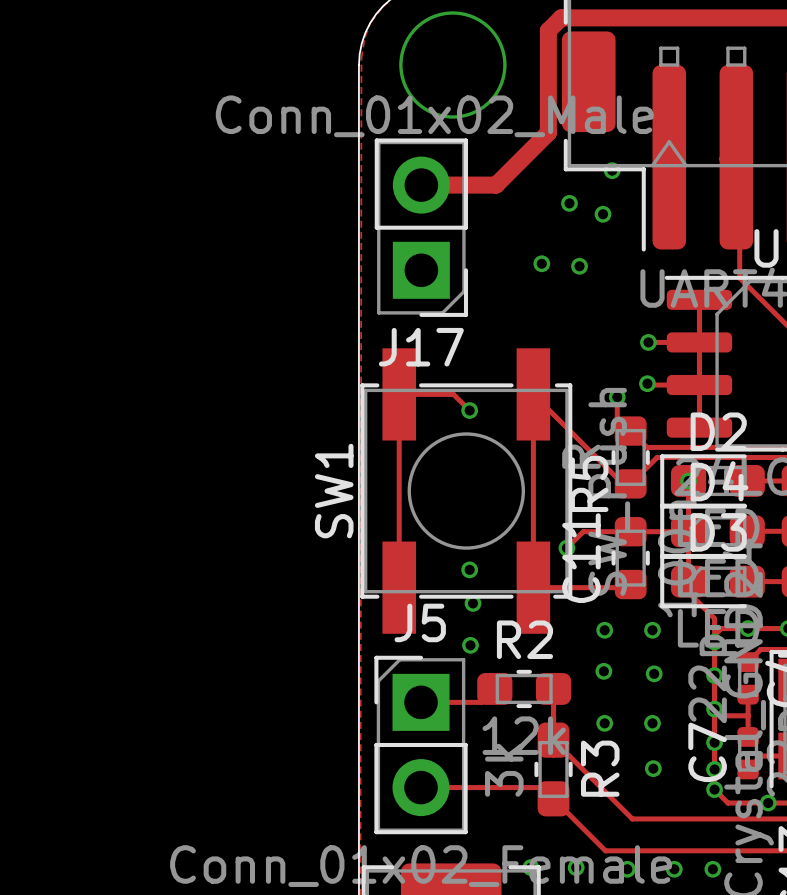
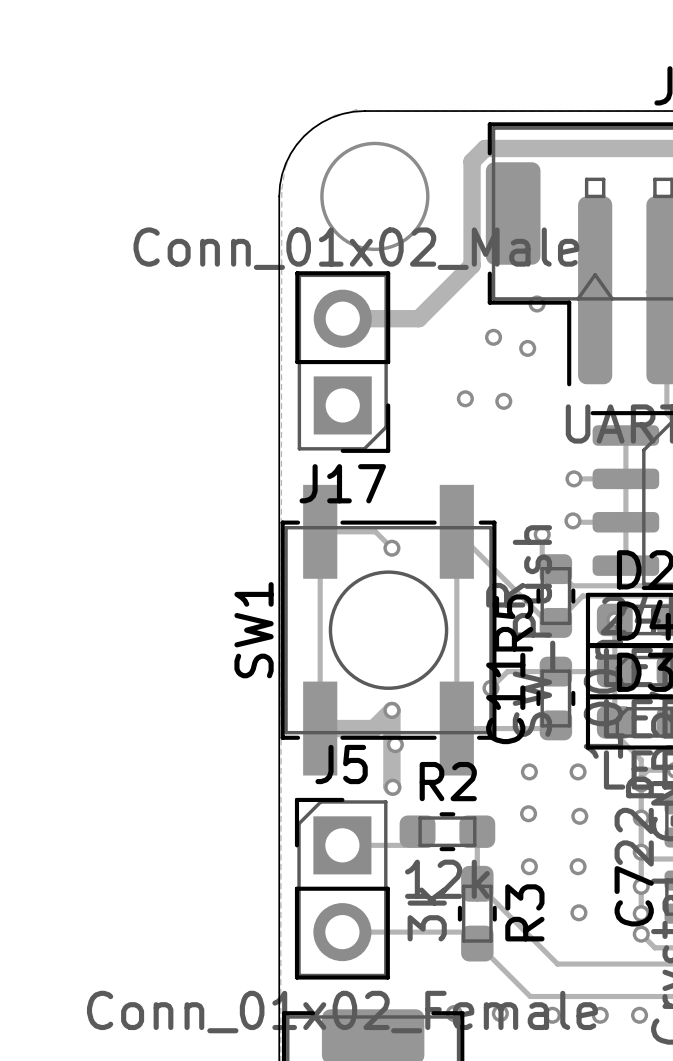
track: none -> (320, 728) (373, 728) (391, 710) (392, 787)

